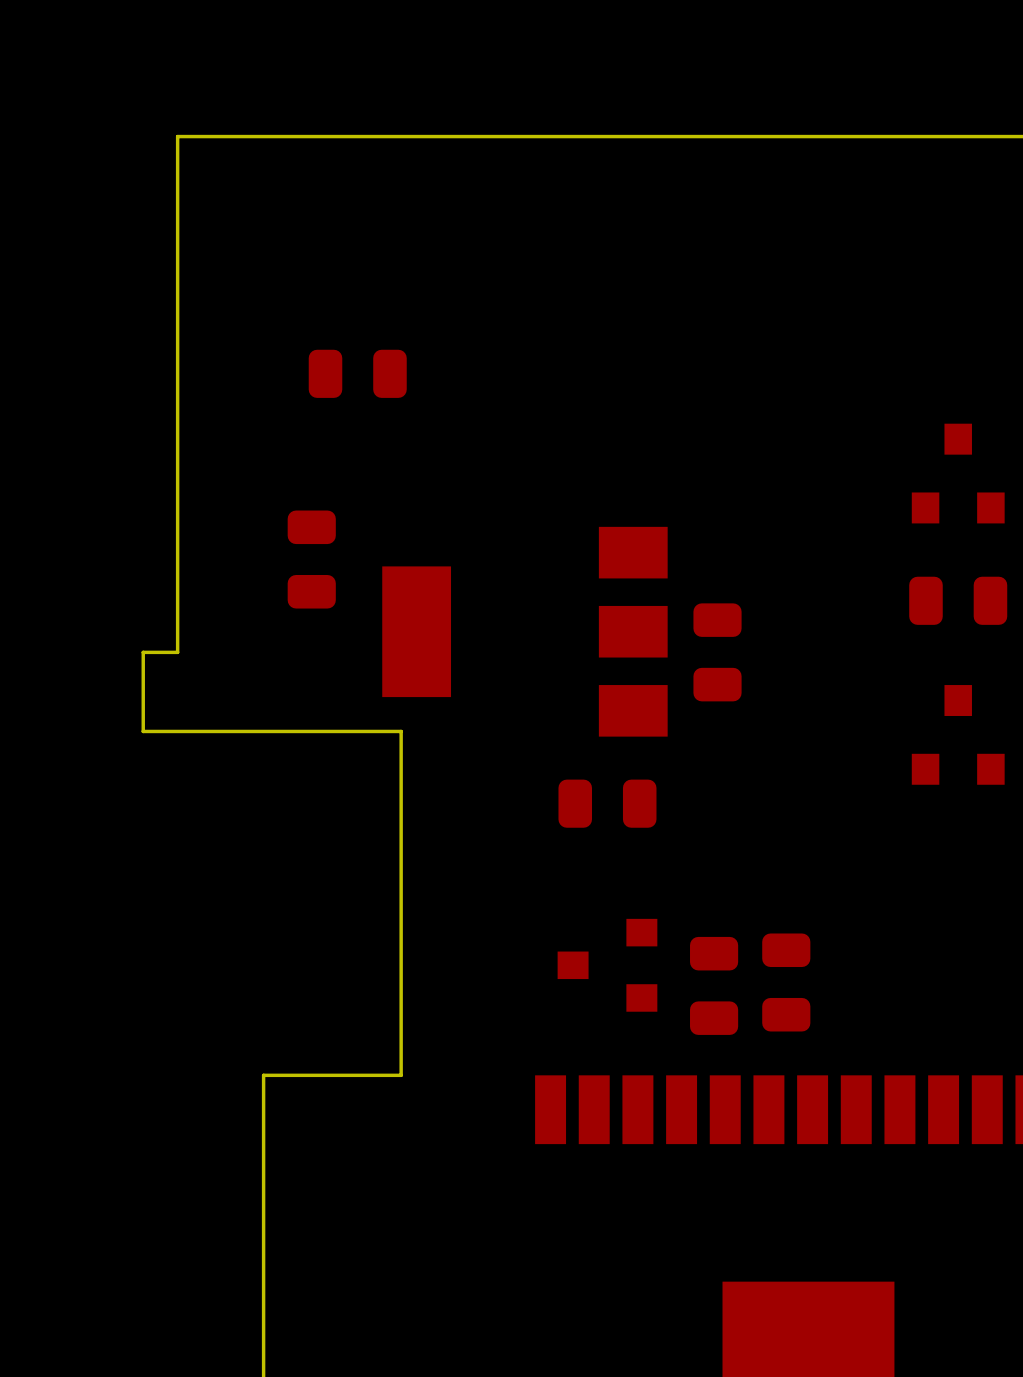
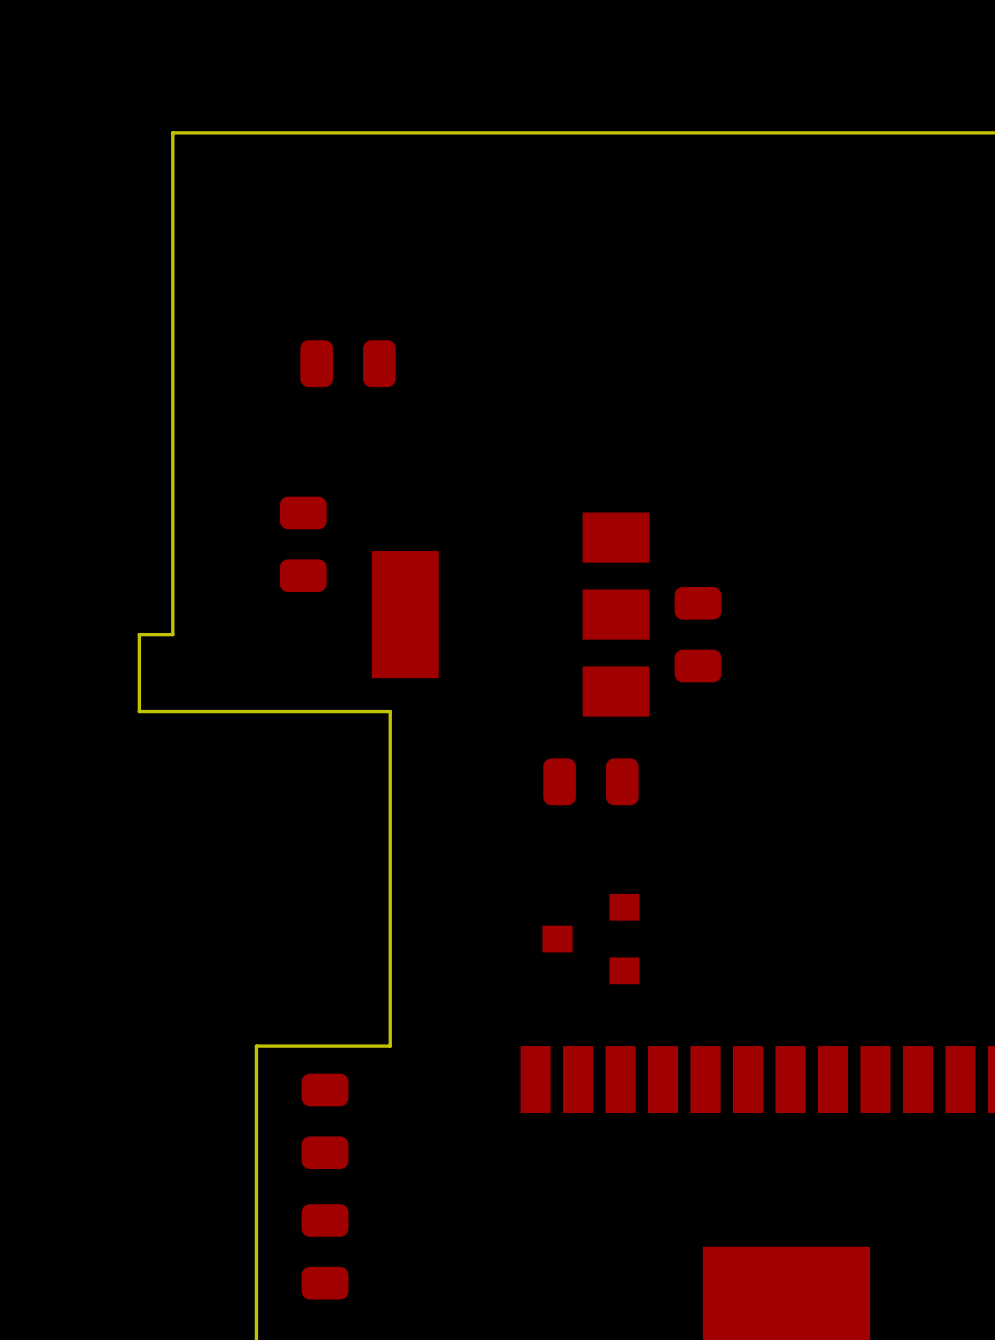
part: (958, 473) -> none
part: (958, 600) -> none
part: (958, 734) -> none
part: (786, 982) -> none
part: (714, 985) -> none
part: none -> (325, 1121)
part: none -> (325, 1251)

